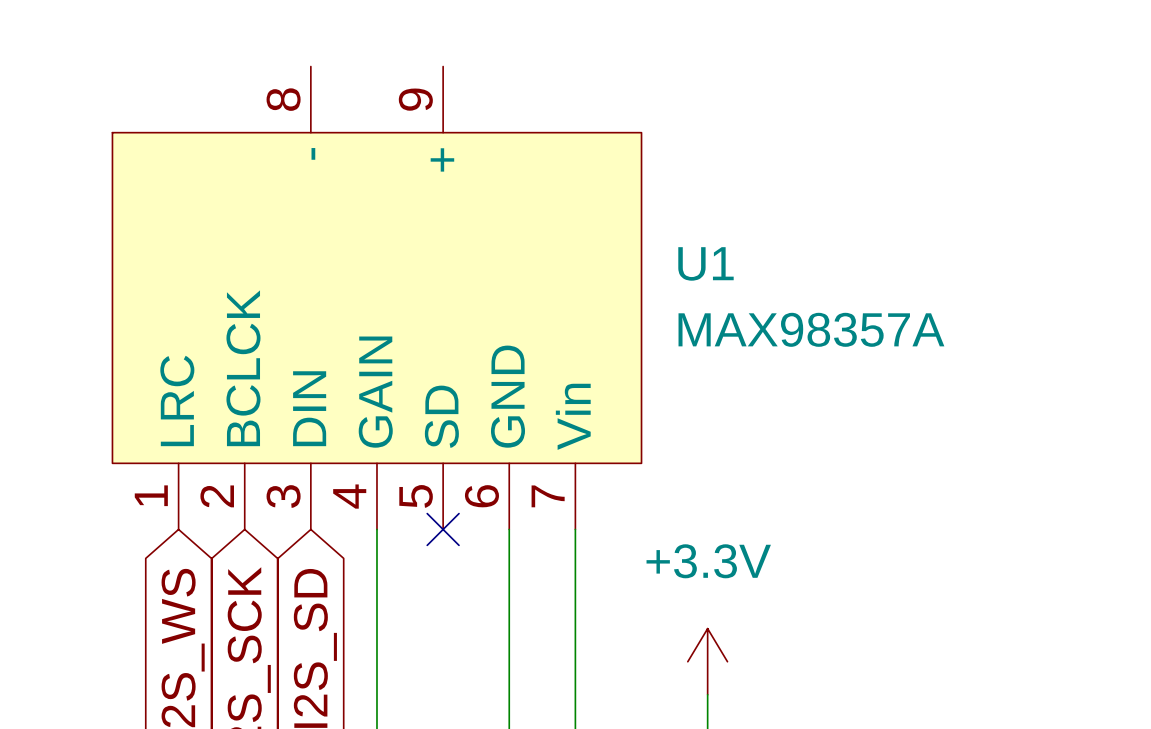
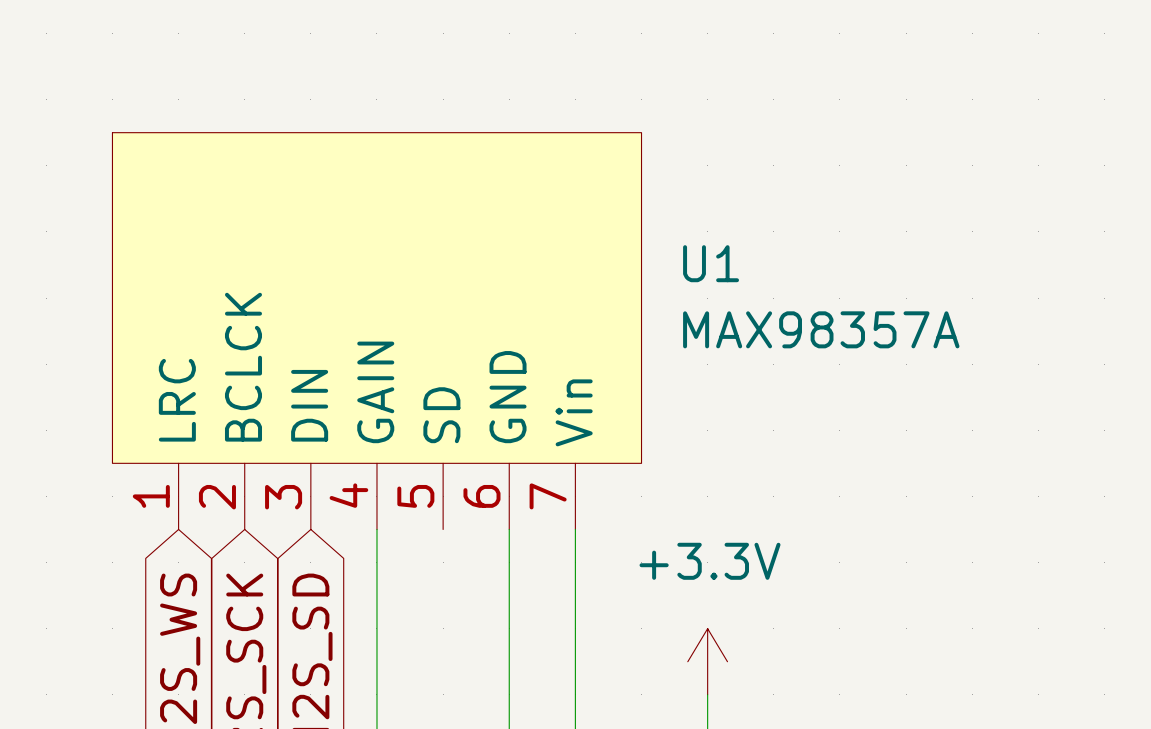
U1 symbol: [112, 66, 642, 530] -> [112, 132, 642, 530]
no-connect mark: (443, 529) -> none

